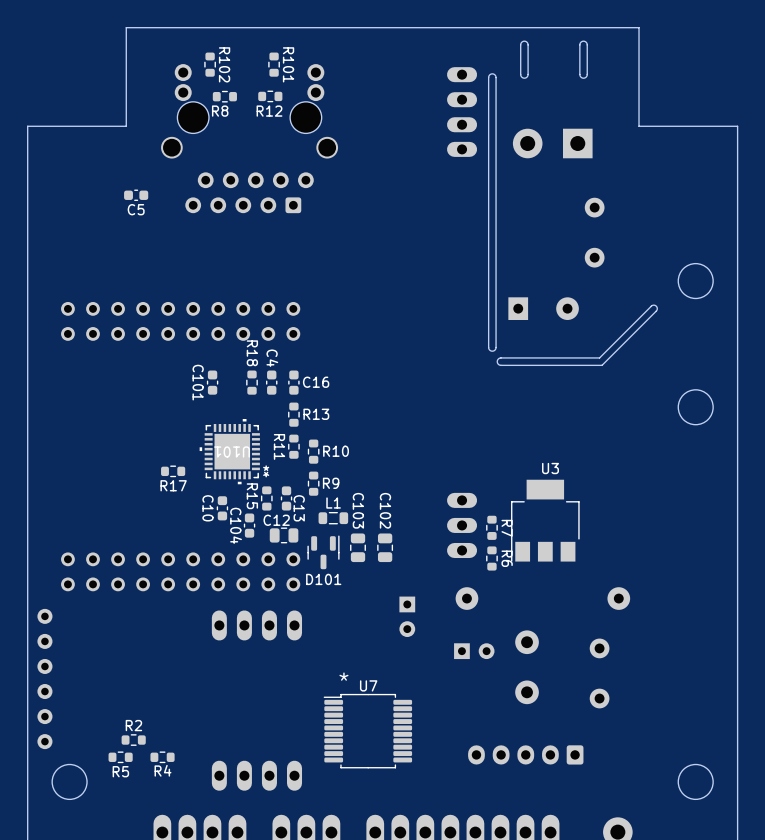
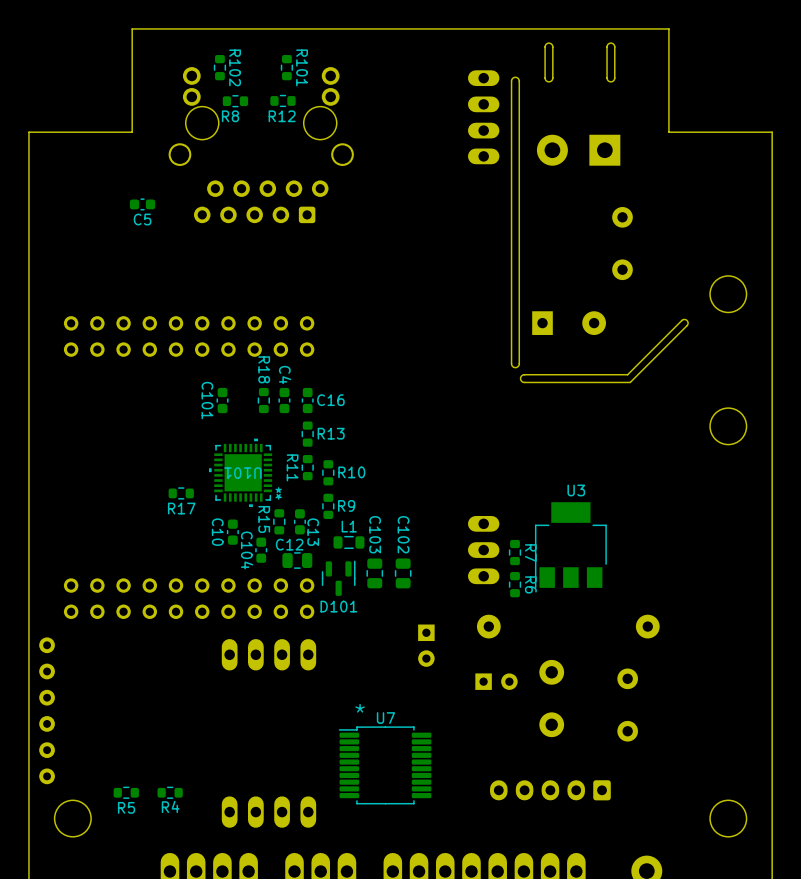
R2: (133, 740) -> none

